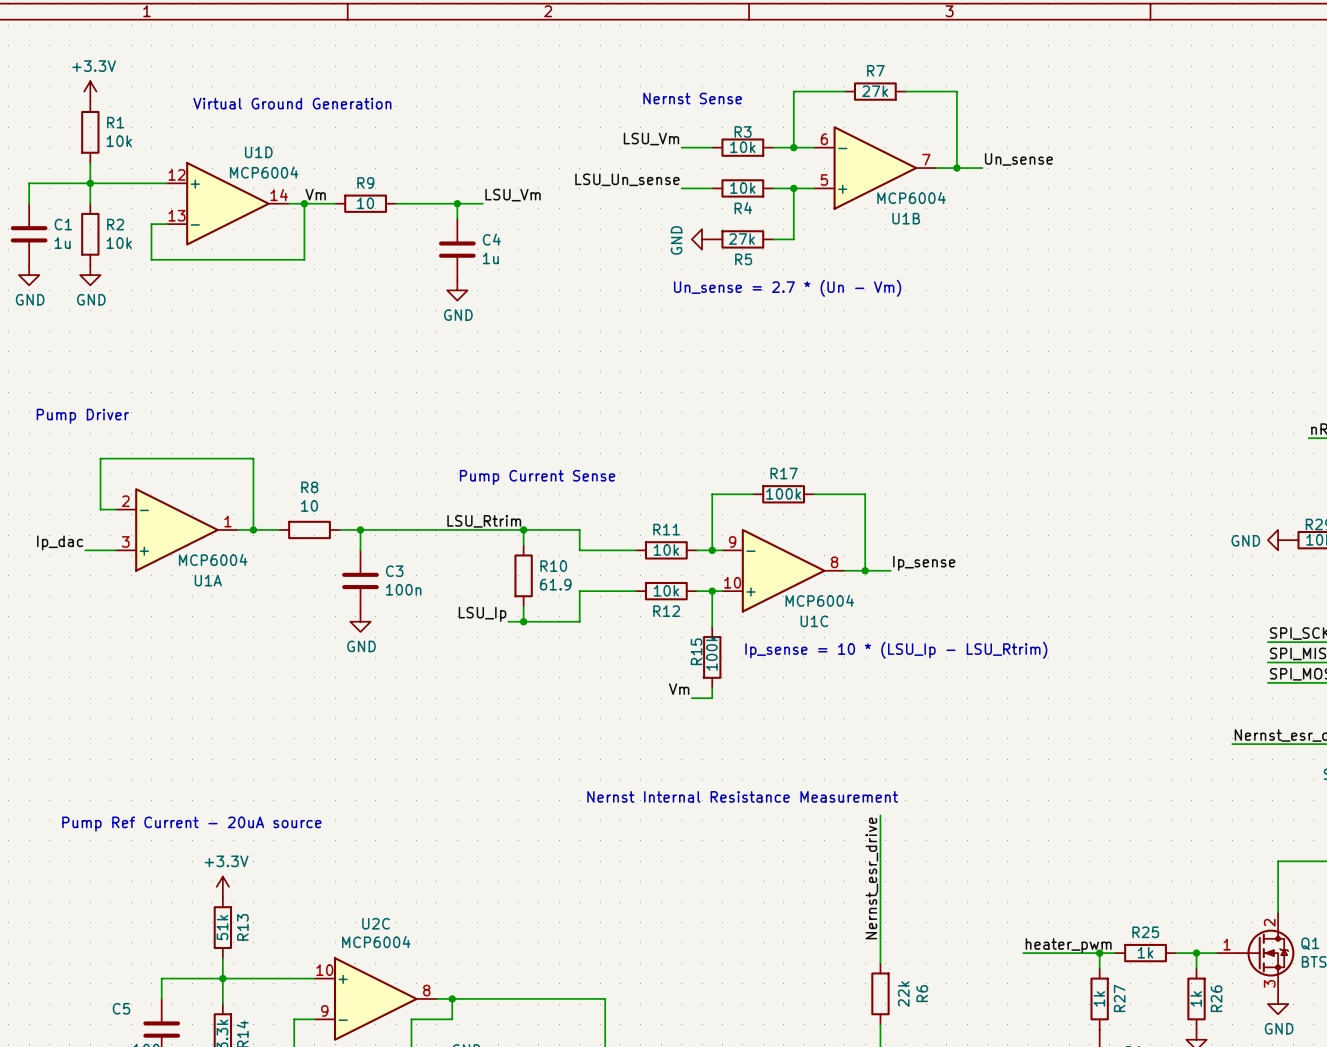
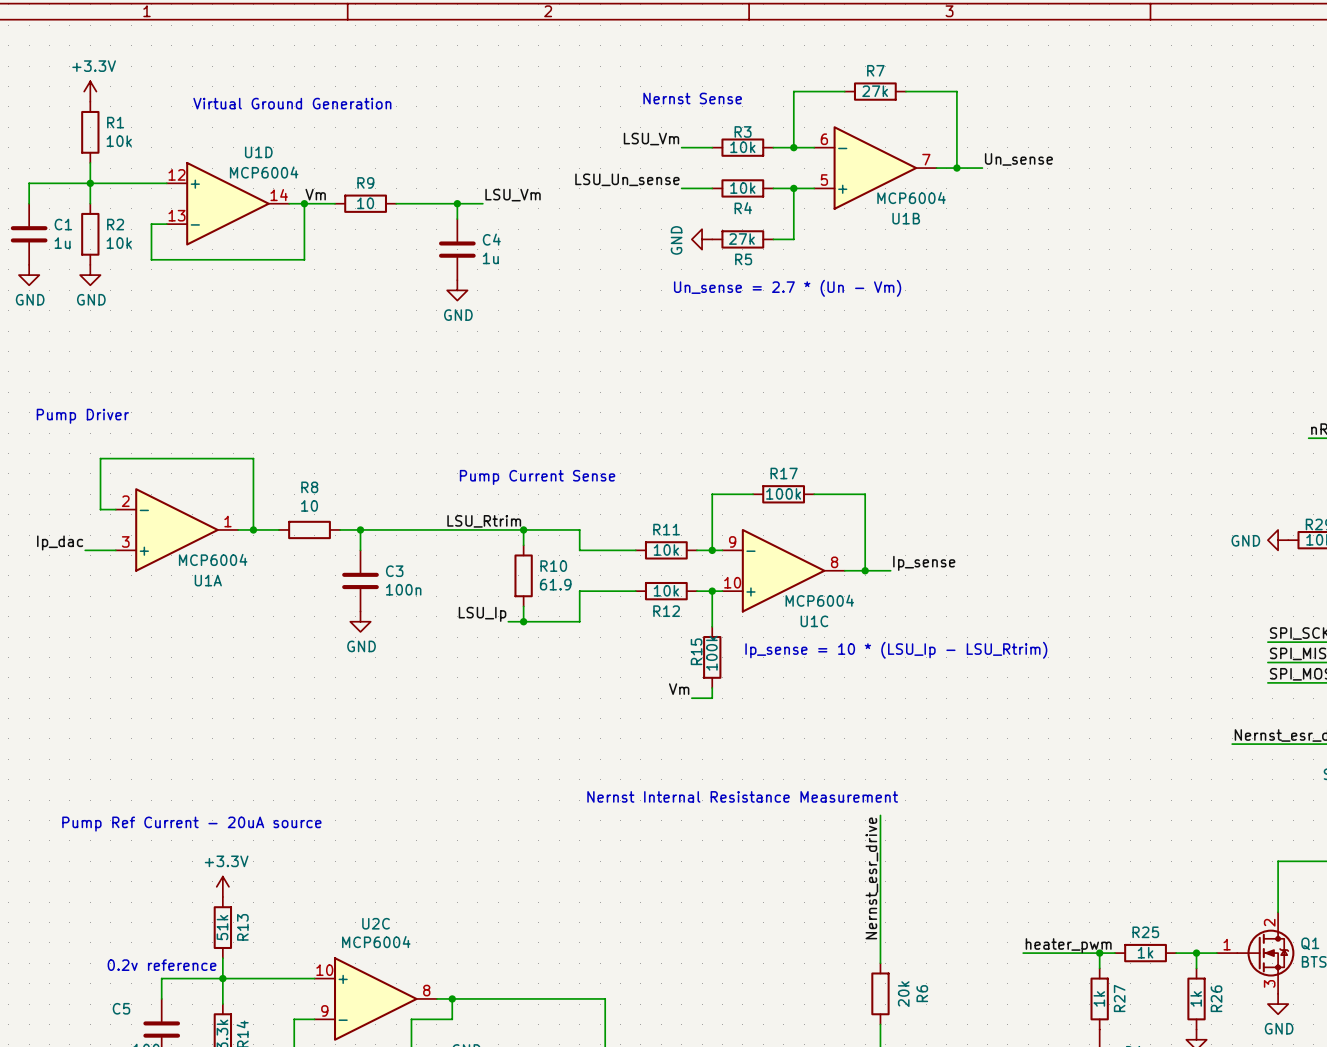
text: none -> 0.2v reference (162, 965)
R6 value: 22k (903, 994) -> 20k (903, 994)

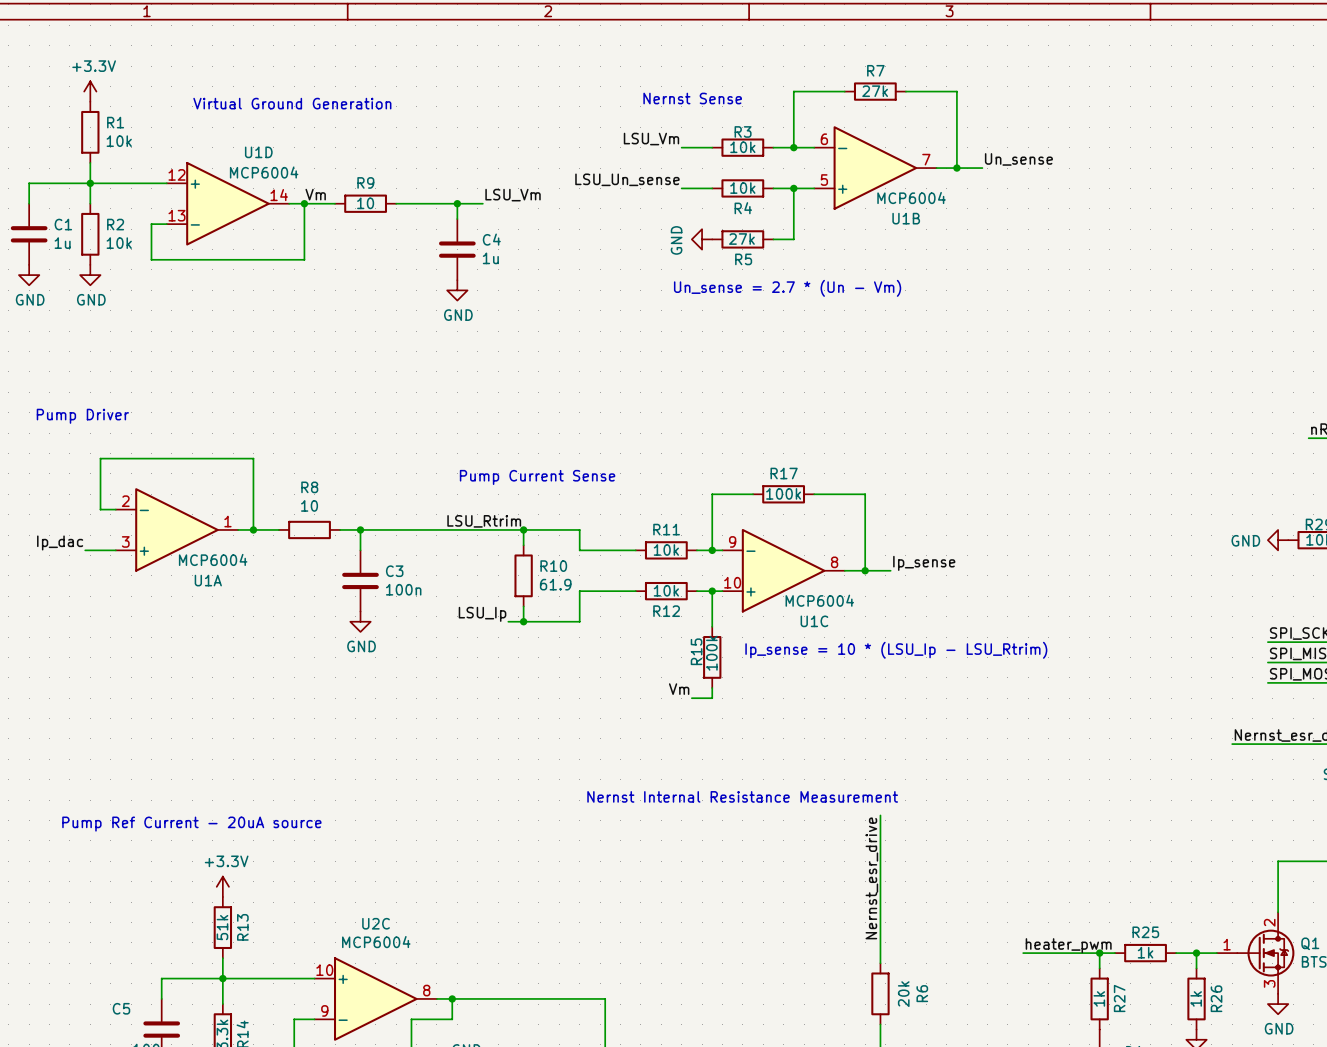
text: 0.2v reference (162, 965) -> none

